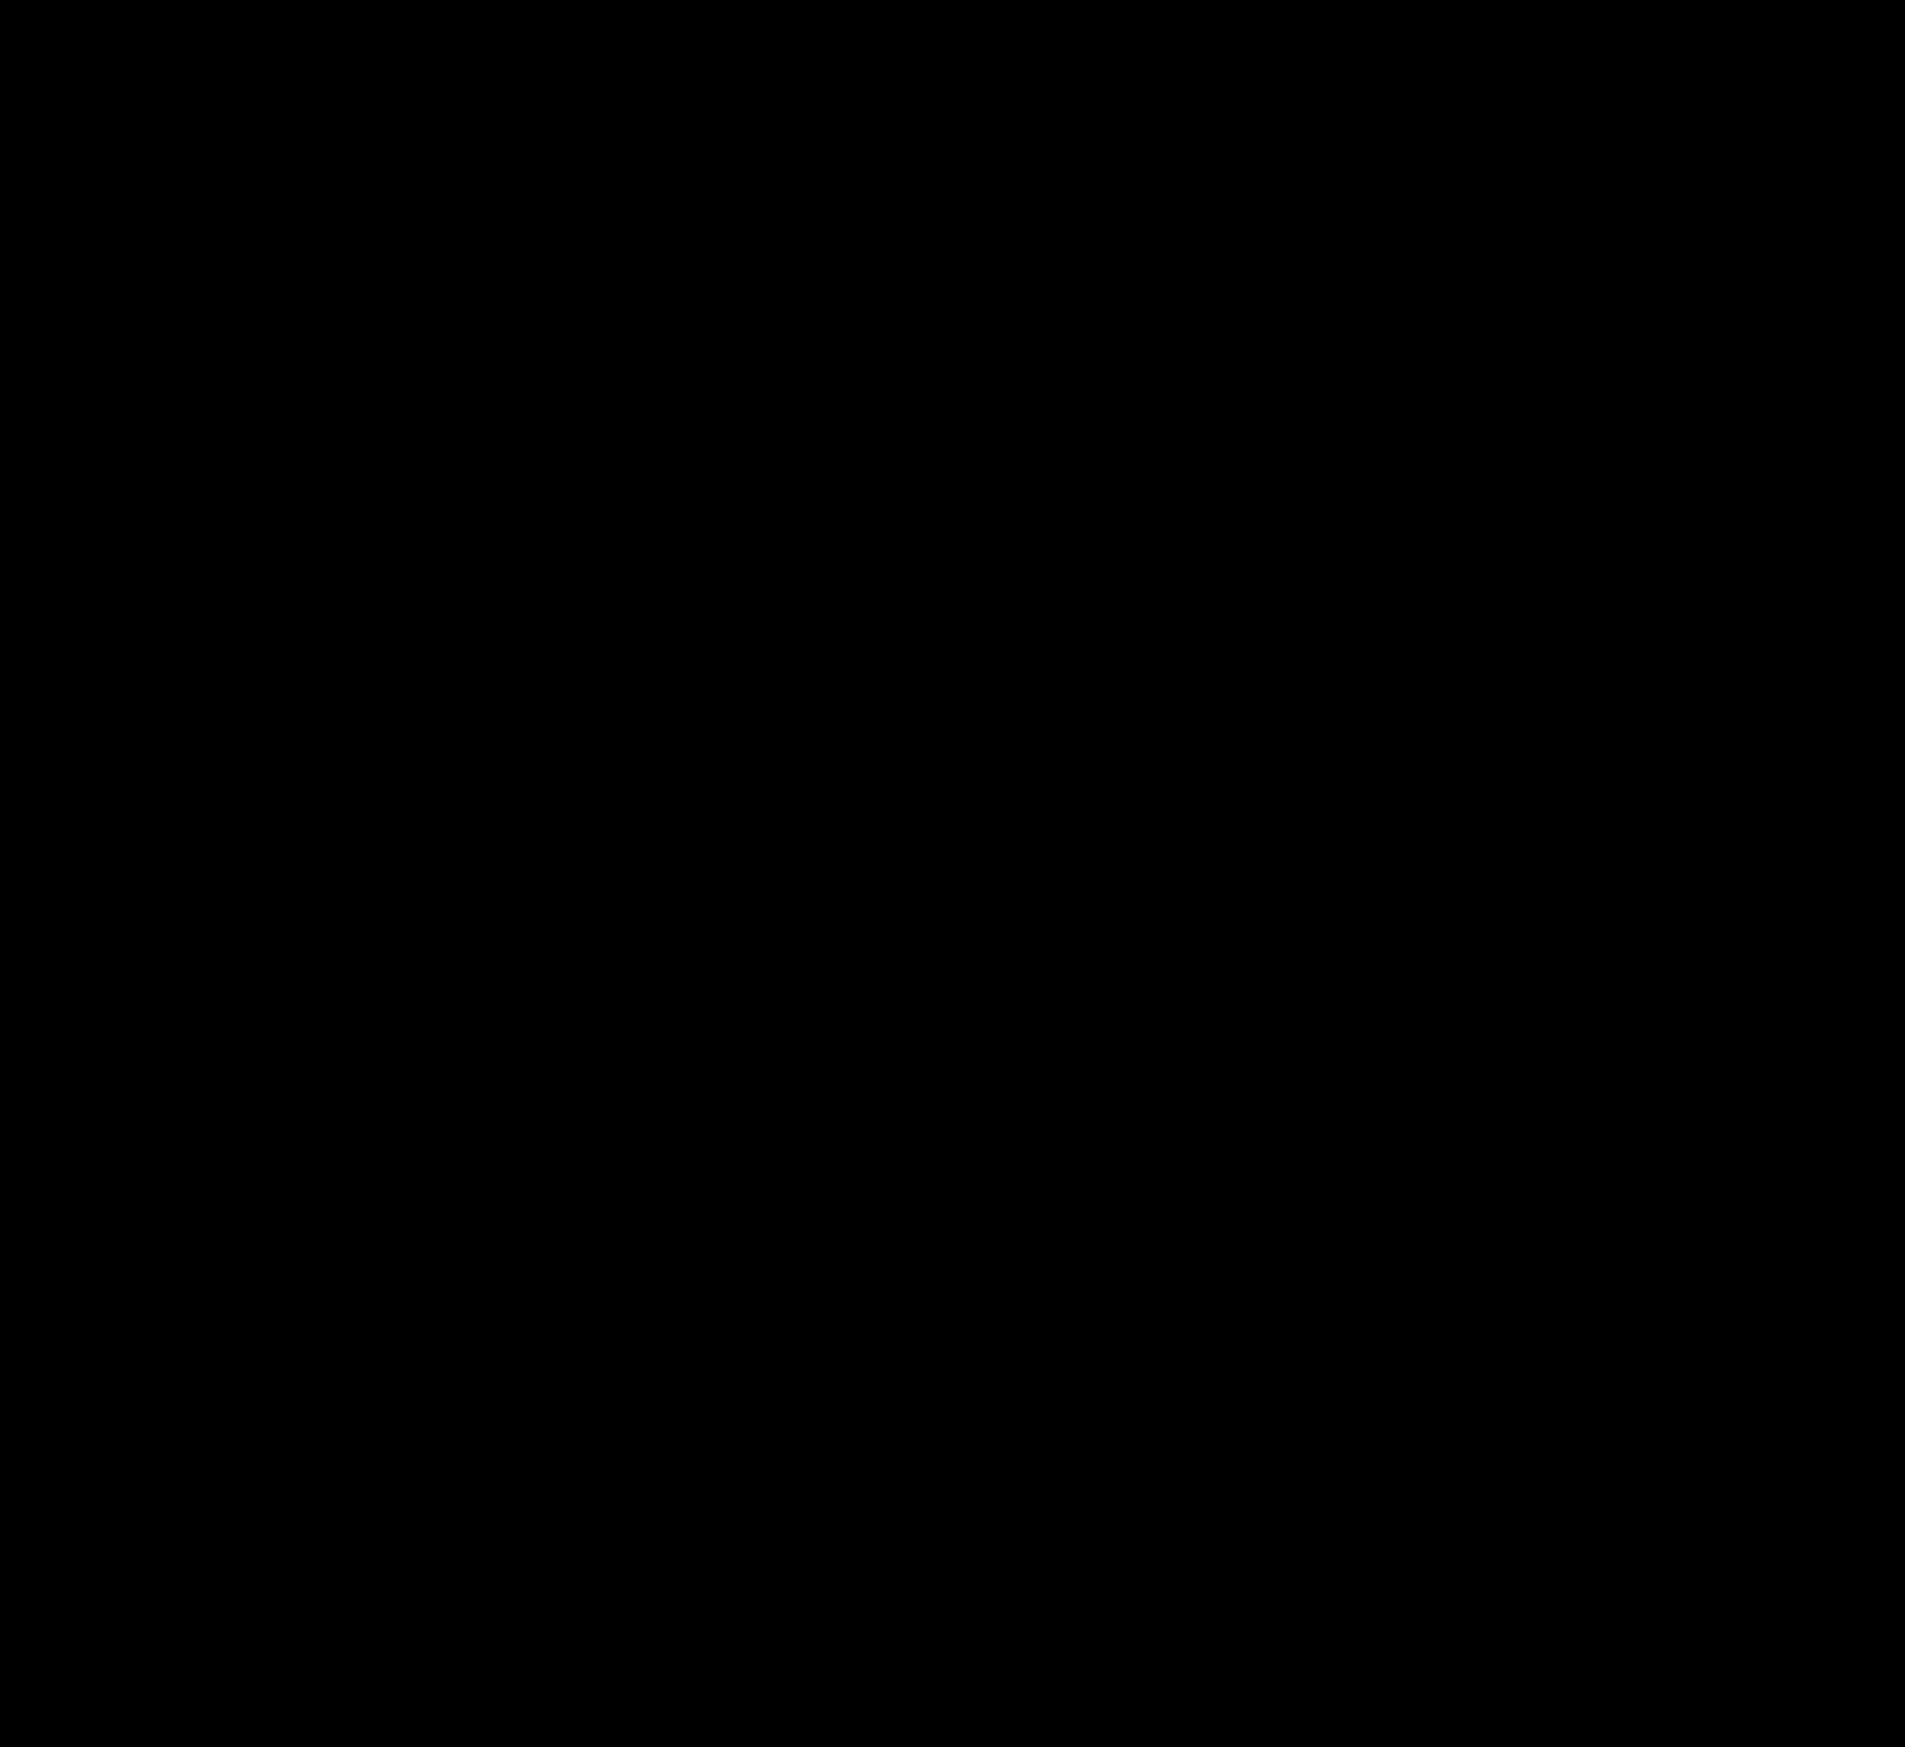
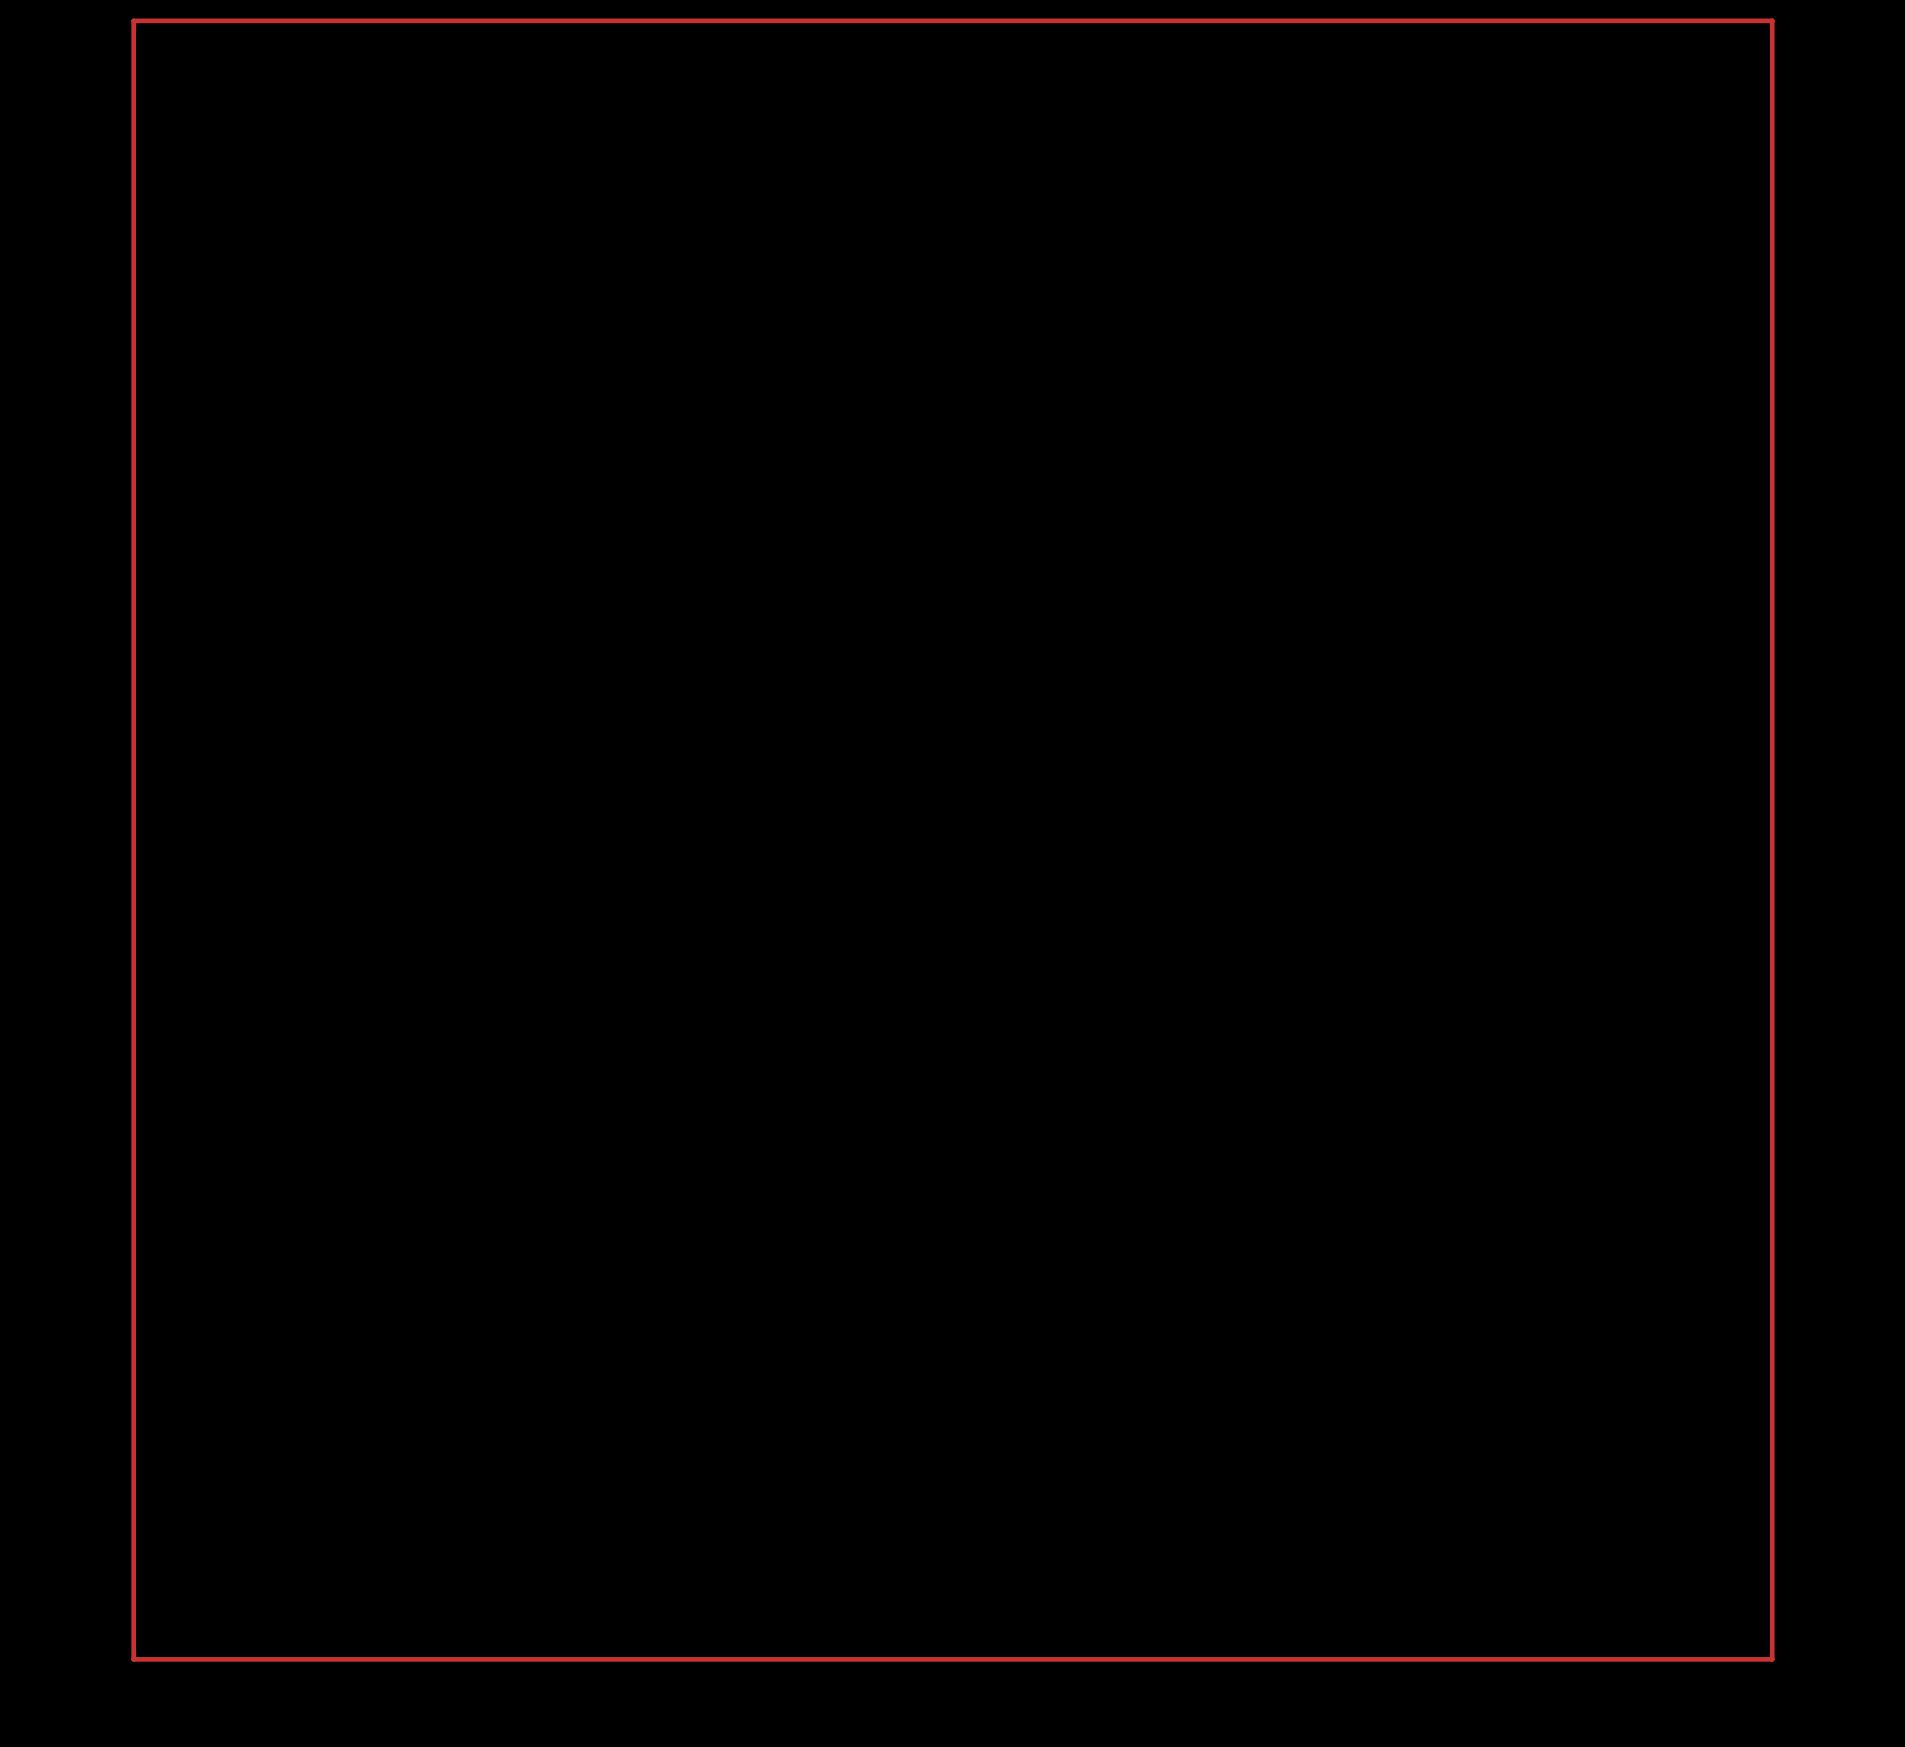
top track: none -> (133, 20) (1772, 20) (1772, 1659) (133, 1659) (133, 20)

